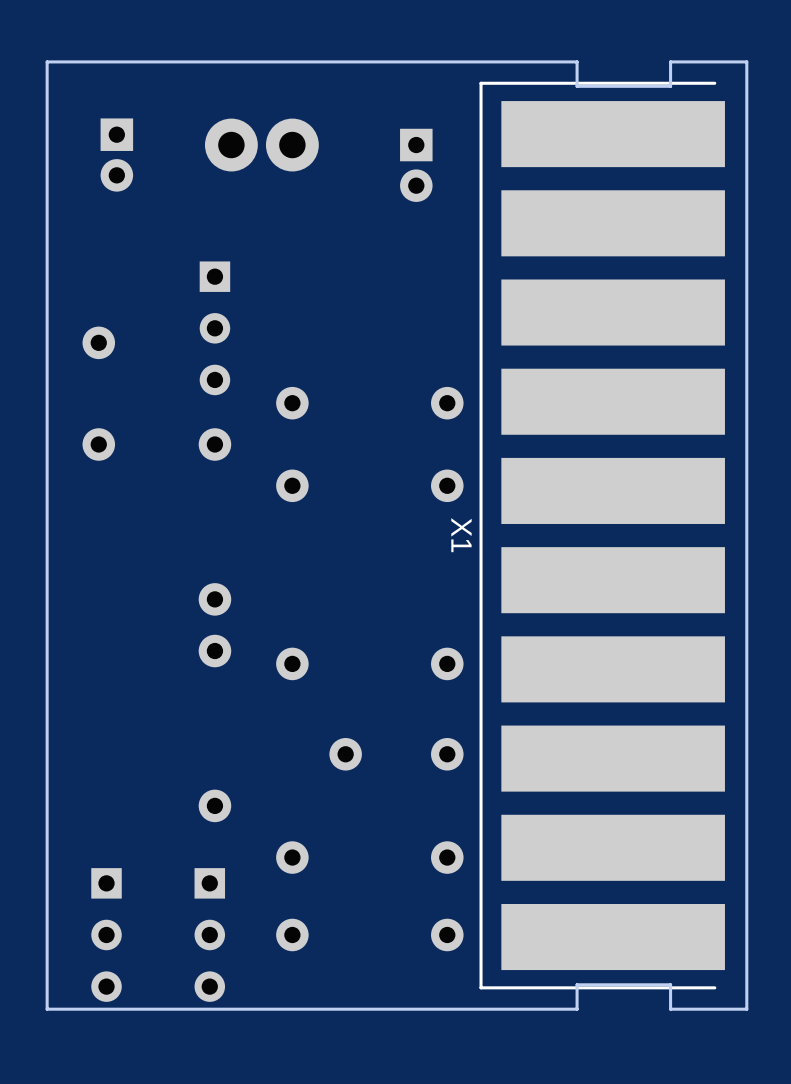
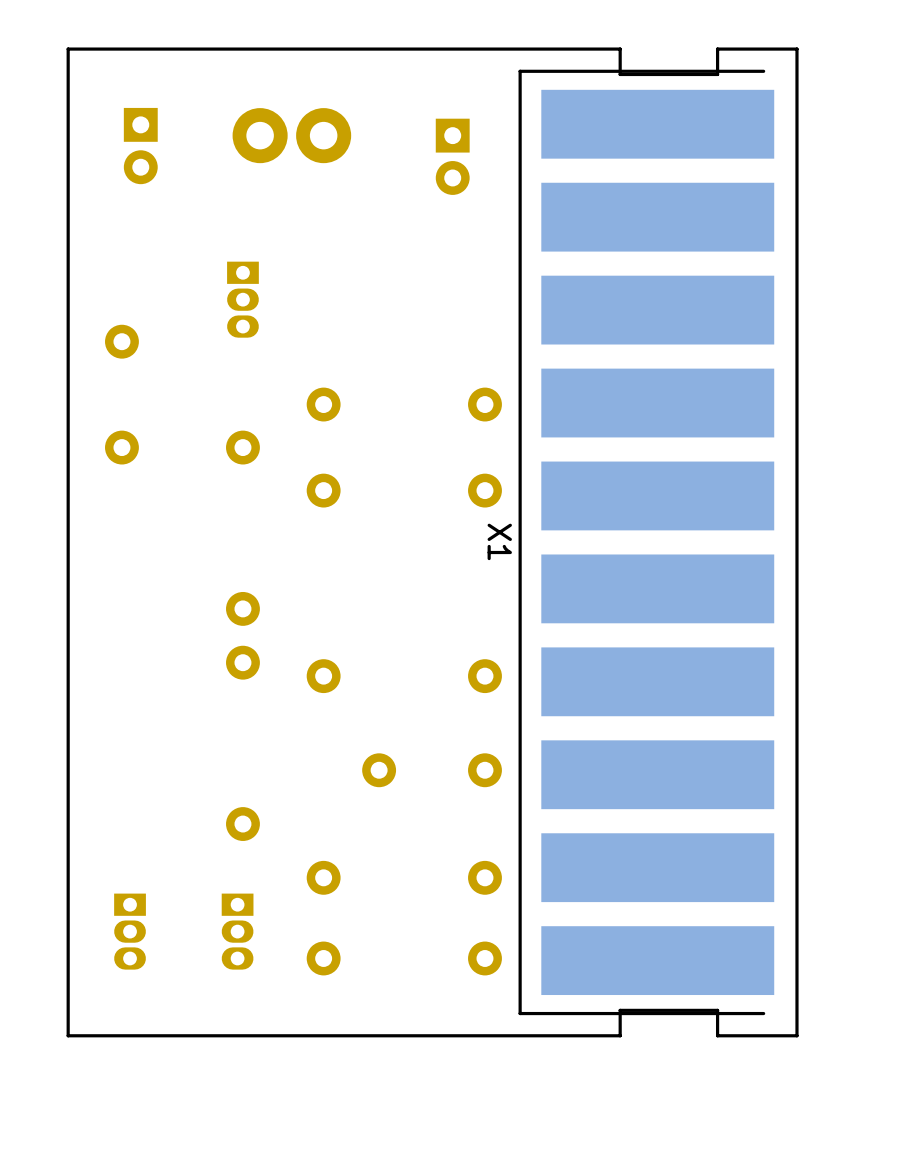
part: none -> (242, 299)
part: (214, 328) -> none
part: none -> (130, 931)
part: none -> (237, 931)
part: (106, 934) -> none
part: (209, 934) -> none

